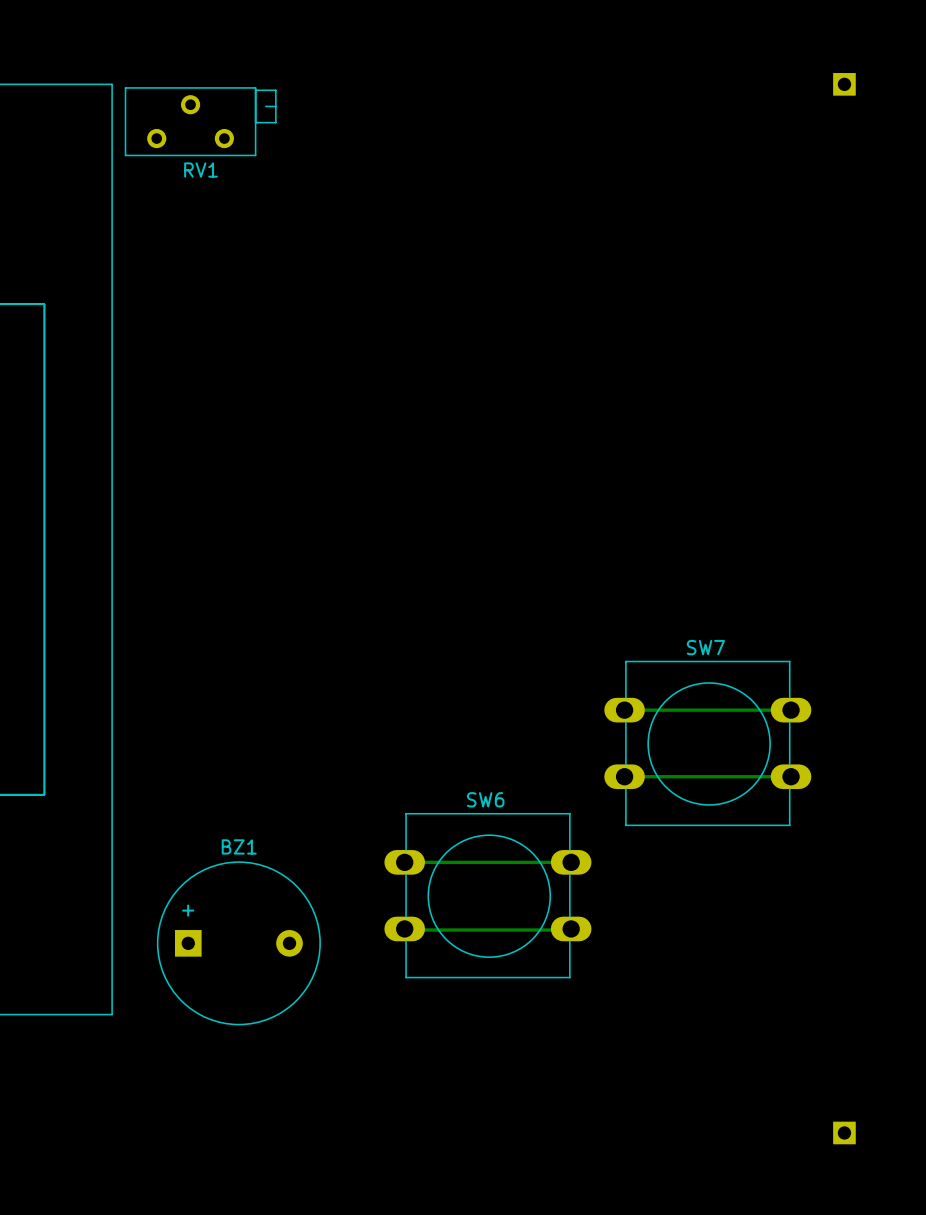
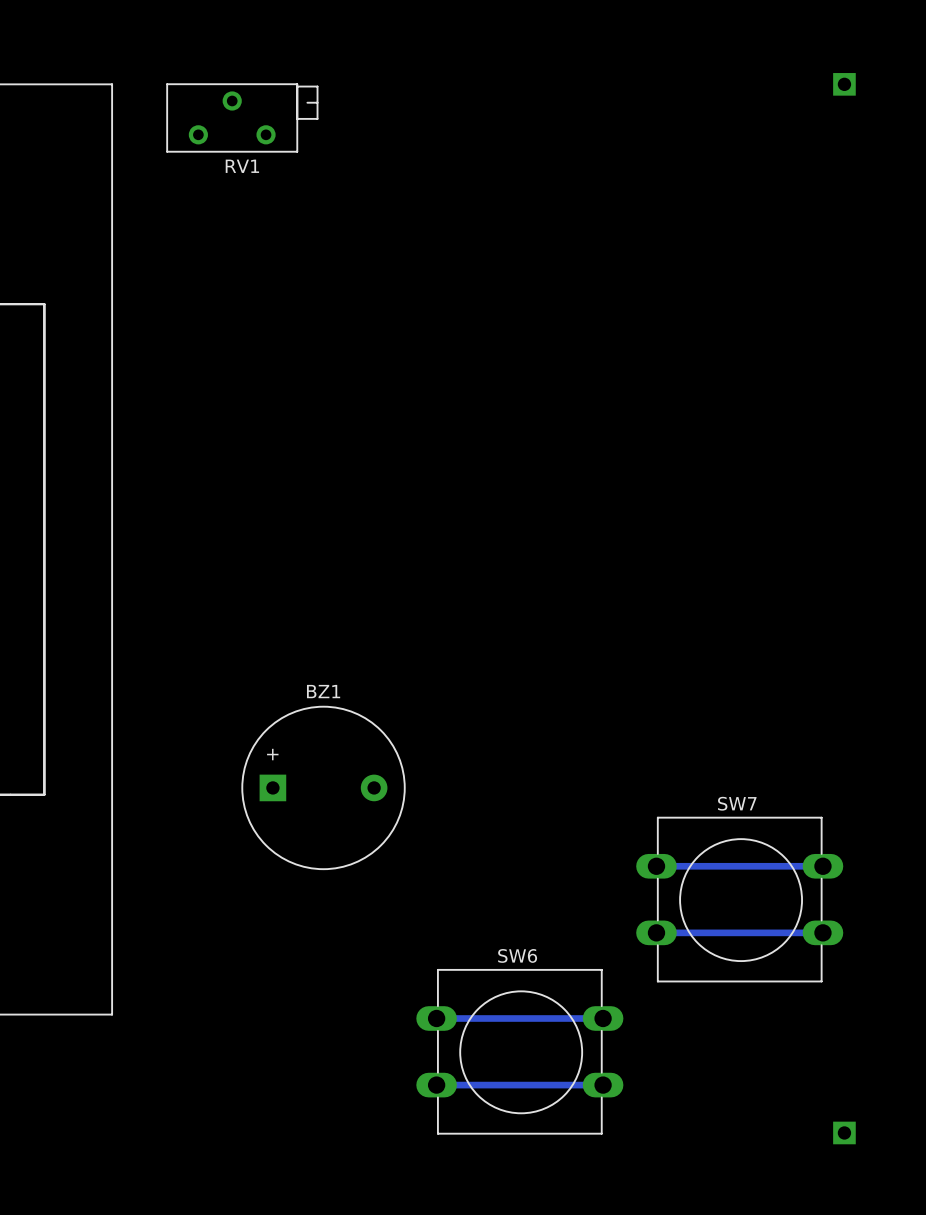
RV1 position: (200, 121) -> (242, 117)
track: (791, 710) (624, 710) -> (822, 866) (656, 866)
SW7 position: (707, 743) -> (739, 899)
track: (791, 776) (624, 776) -> (822, 932) (656, 932)
track: (571, 862) (404, 862) -> (603, 1018) (436, 1018)
SW6 position: (487, 895) -> (519, 1051)
track: (571, 930) (404, 930) -> (603, 1085) (436, 1085)
BZ1 position: (238, 943) -> (323, 787)

